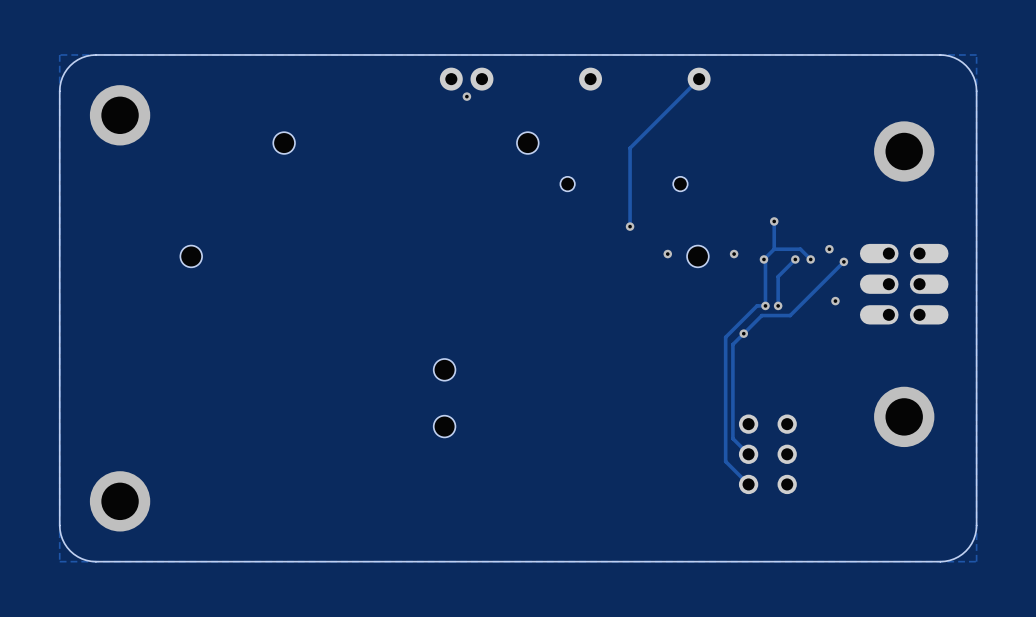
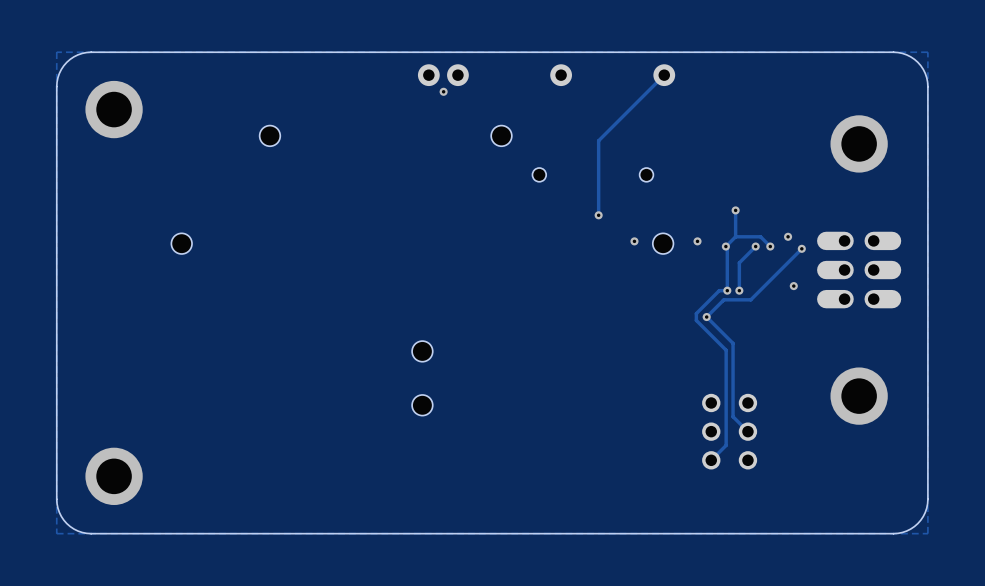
track: (732, 330) (725, 337) (725, 461) (748, 484) -> (696, 313) (696, 320) (726, 350) (726, 445) (711, 460)
track: (743, 333) (732, 344) (732, 438) (748, 454) -> (706, 317) (733, 343) (733, 416) (747, 431)

